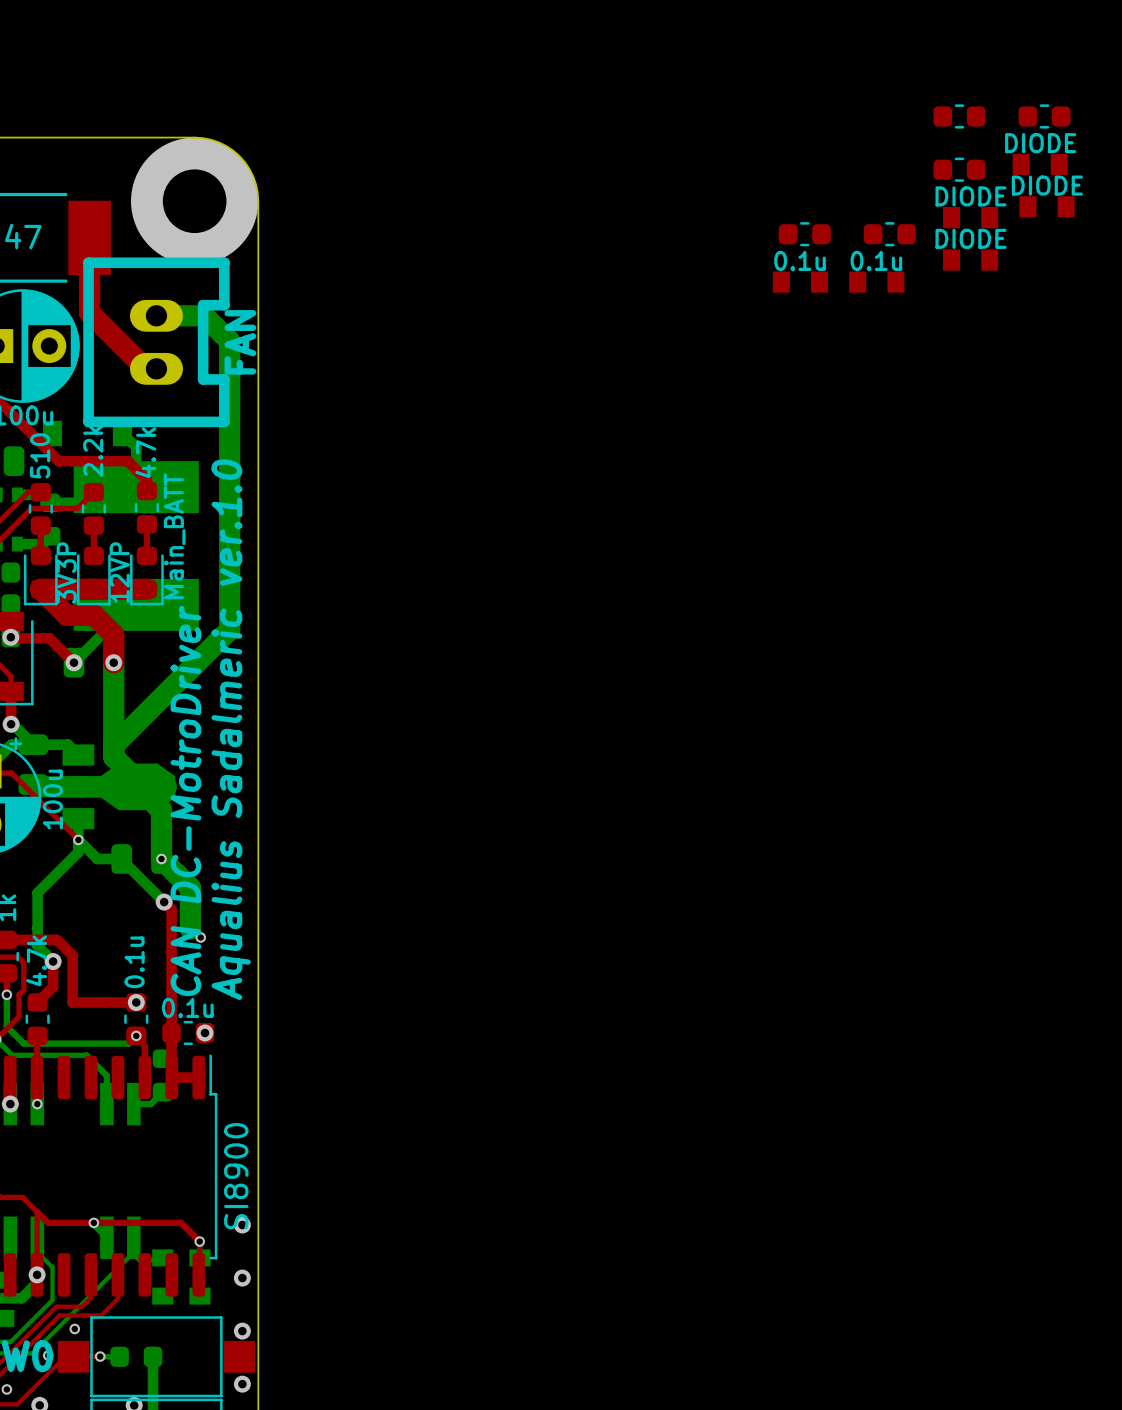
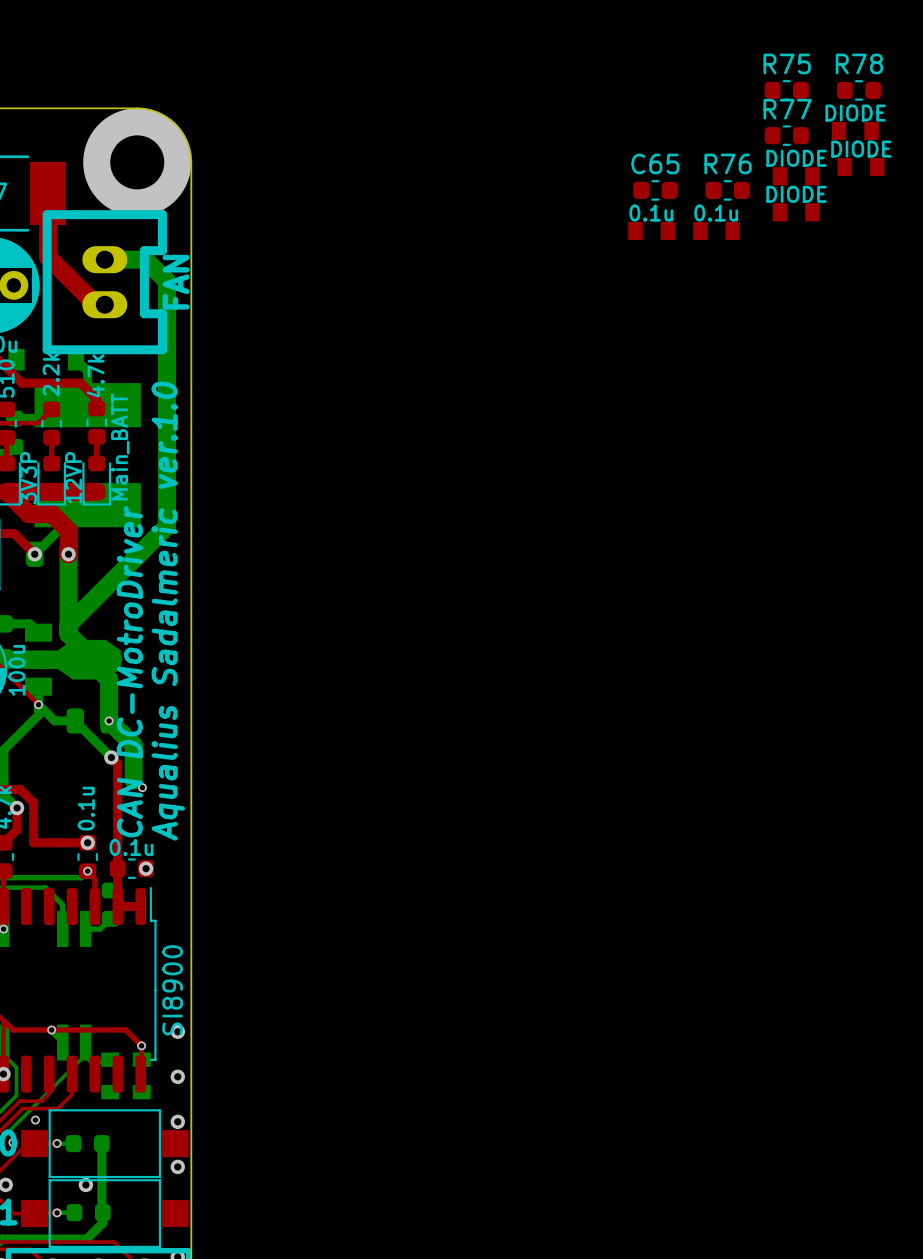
R75 name: none -> R75 (787, 63)
R78 name: none -> R78 (859, 63)
R77 name: none -> R77 (787, 109)
C65 name: none -> C65 (655, 163)
R76 name: none -> R76 (728, 163)

